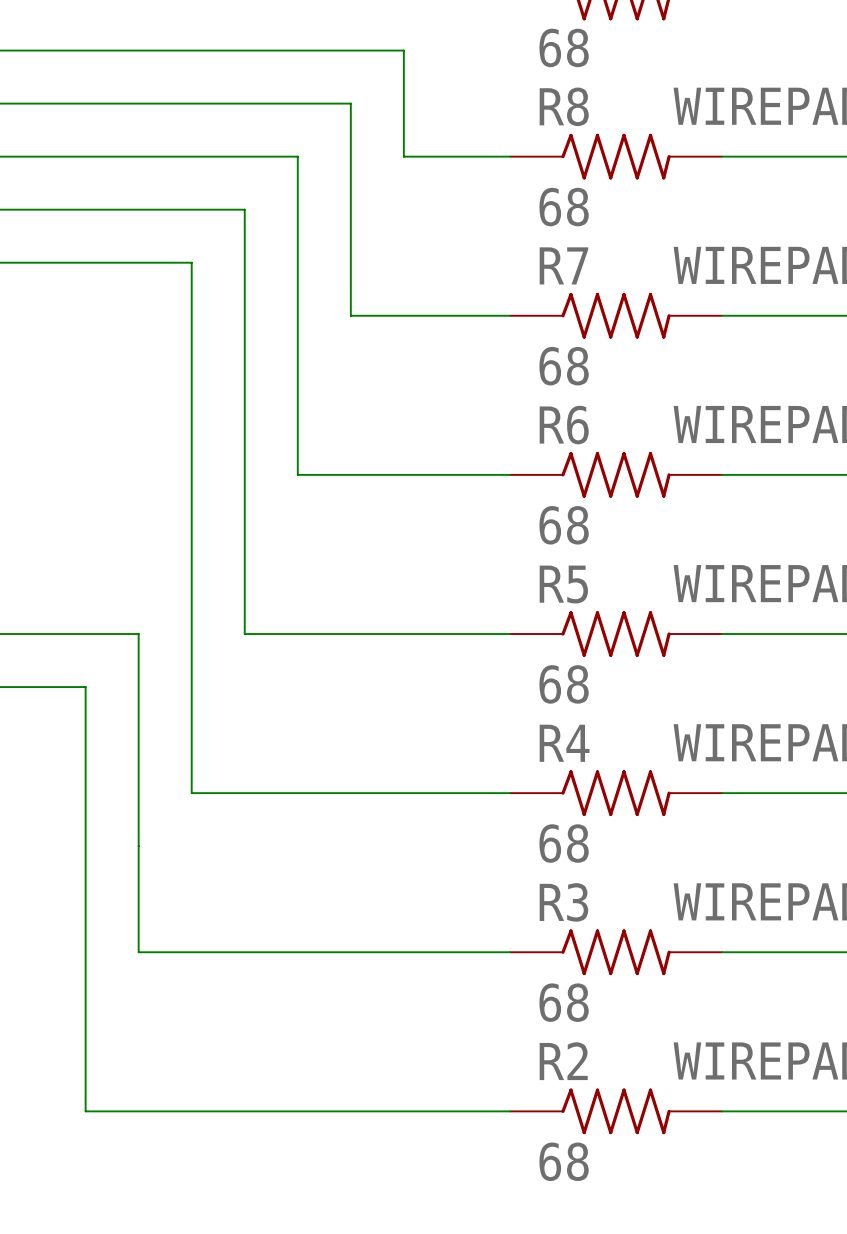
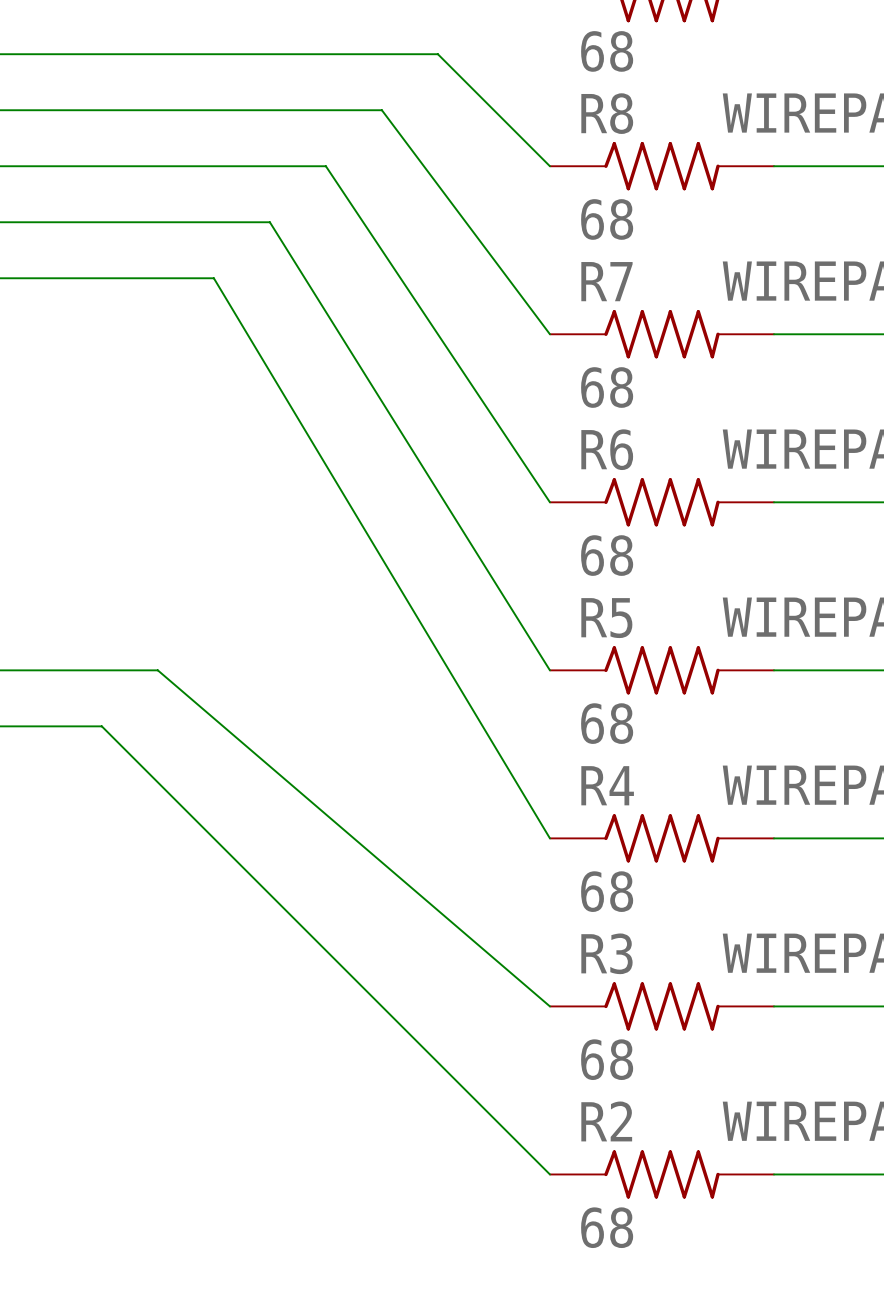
wire: (403, 50) (403, 156) (509, 156) -> (437, 54) (549, 166)
wire: (350, 103) (350, 315) (509, 315) -> (381, 110) (549, 334)
wire: (297, 156) (297, 474) (509, 474) -> (325, 166) (549, 502)
wire: (244, 209) (244, 634) (509, 634) -> (269, 222) (549, 670)
wire: (191, 262) (191, 793) (509, 793) -> (213, 278) (549, 838)
wire: (138, 634) (138, 952) (509, 952) -> (157, 670) (549, 1006)
wire: (85, 687) (85, 1111) (509, 1111) -> (101, 726) (549, 1174)

